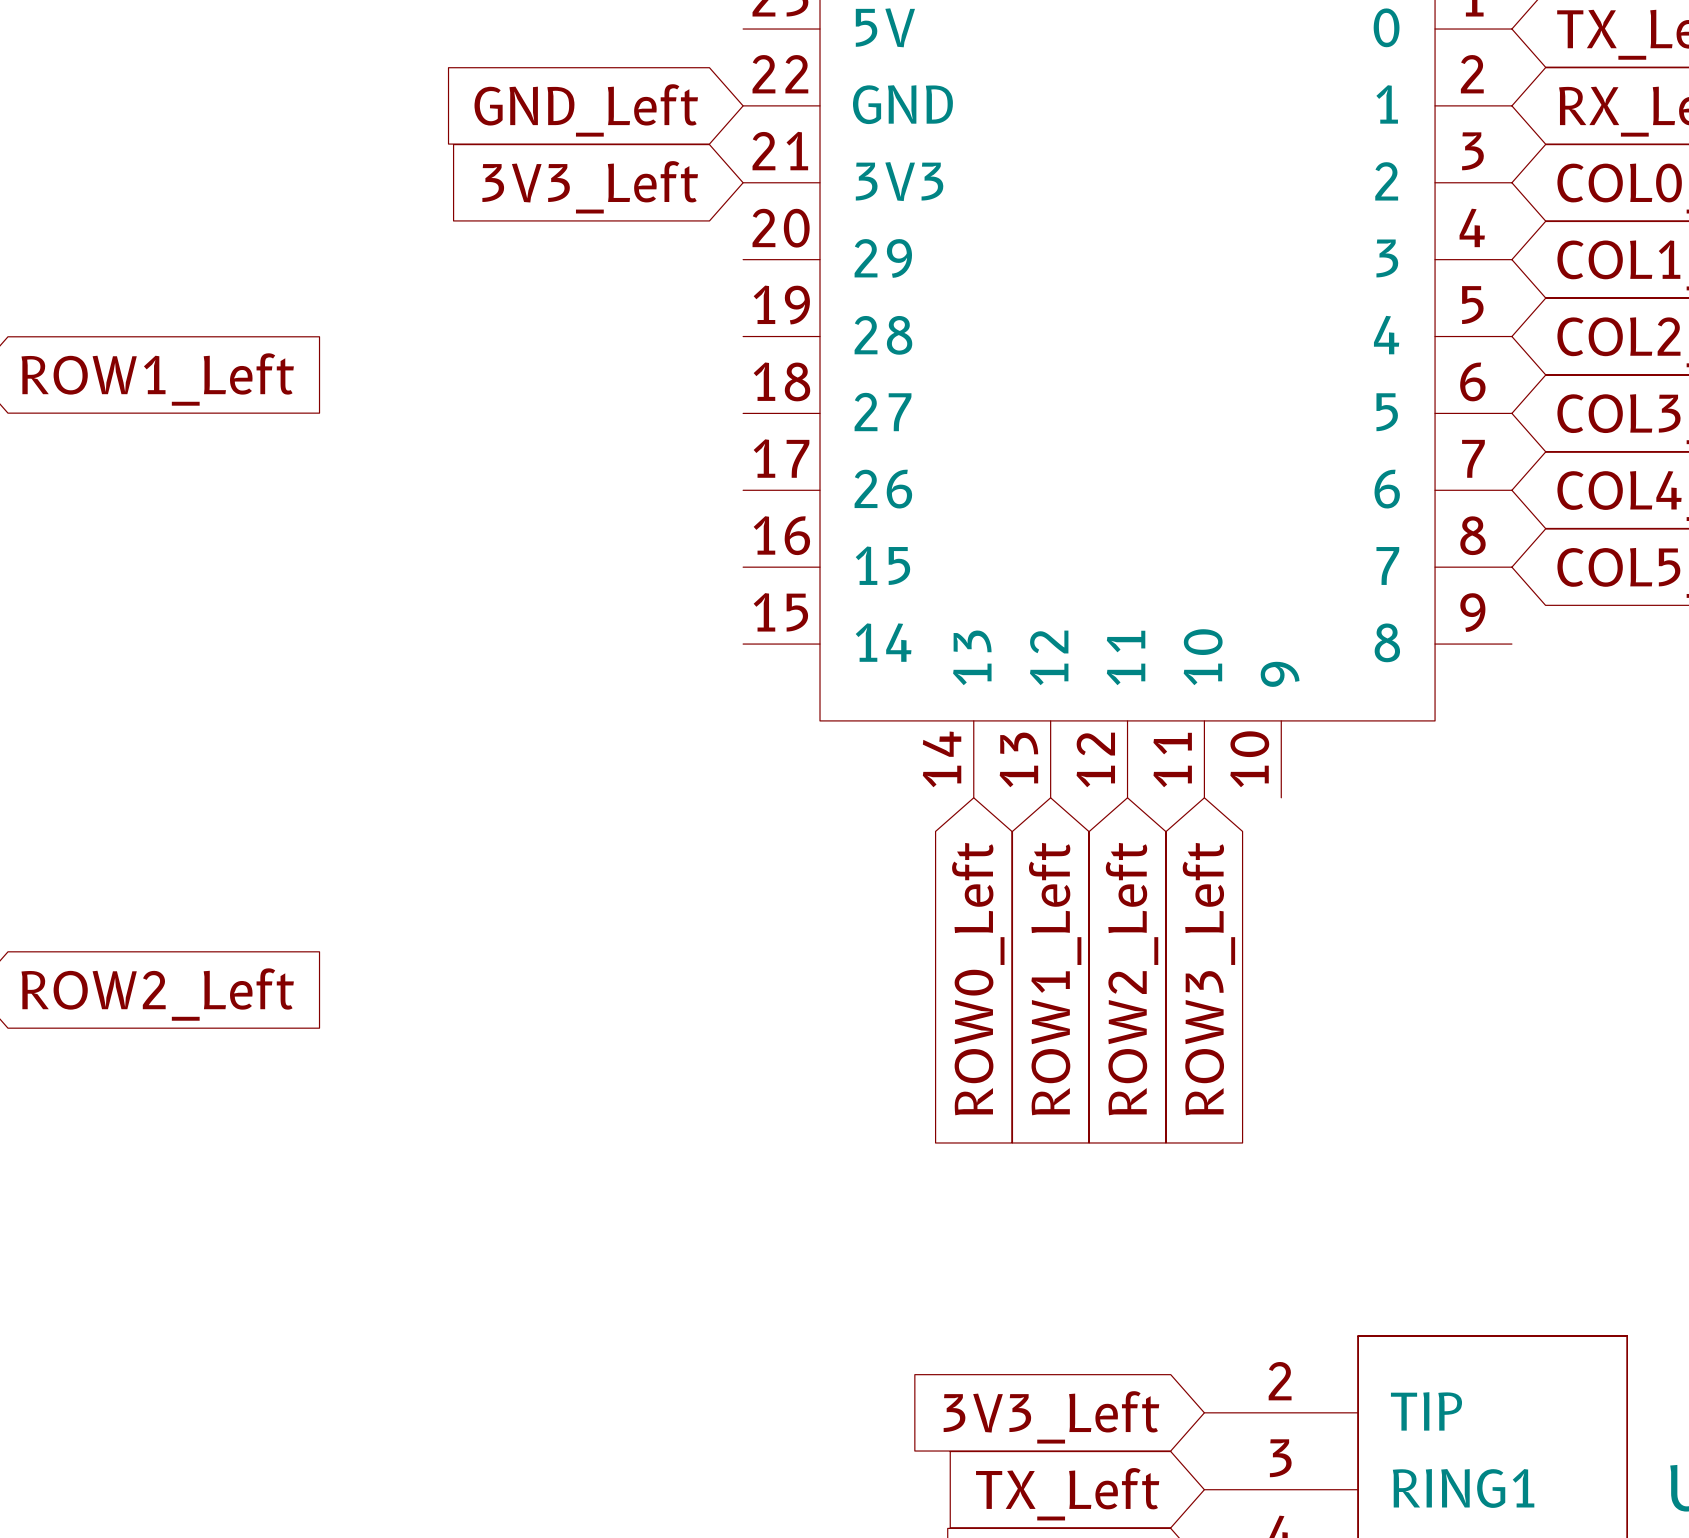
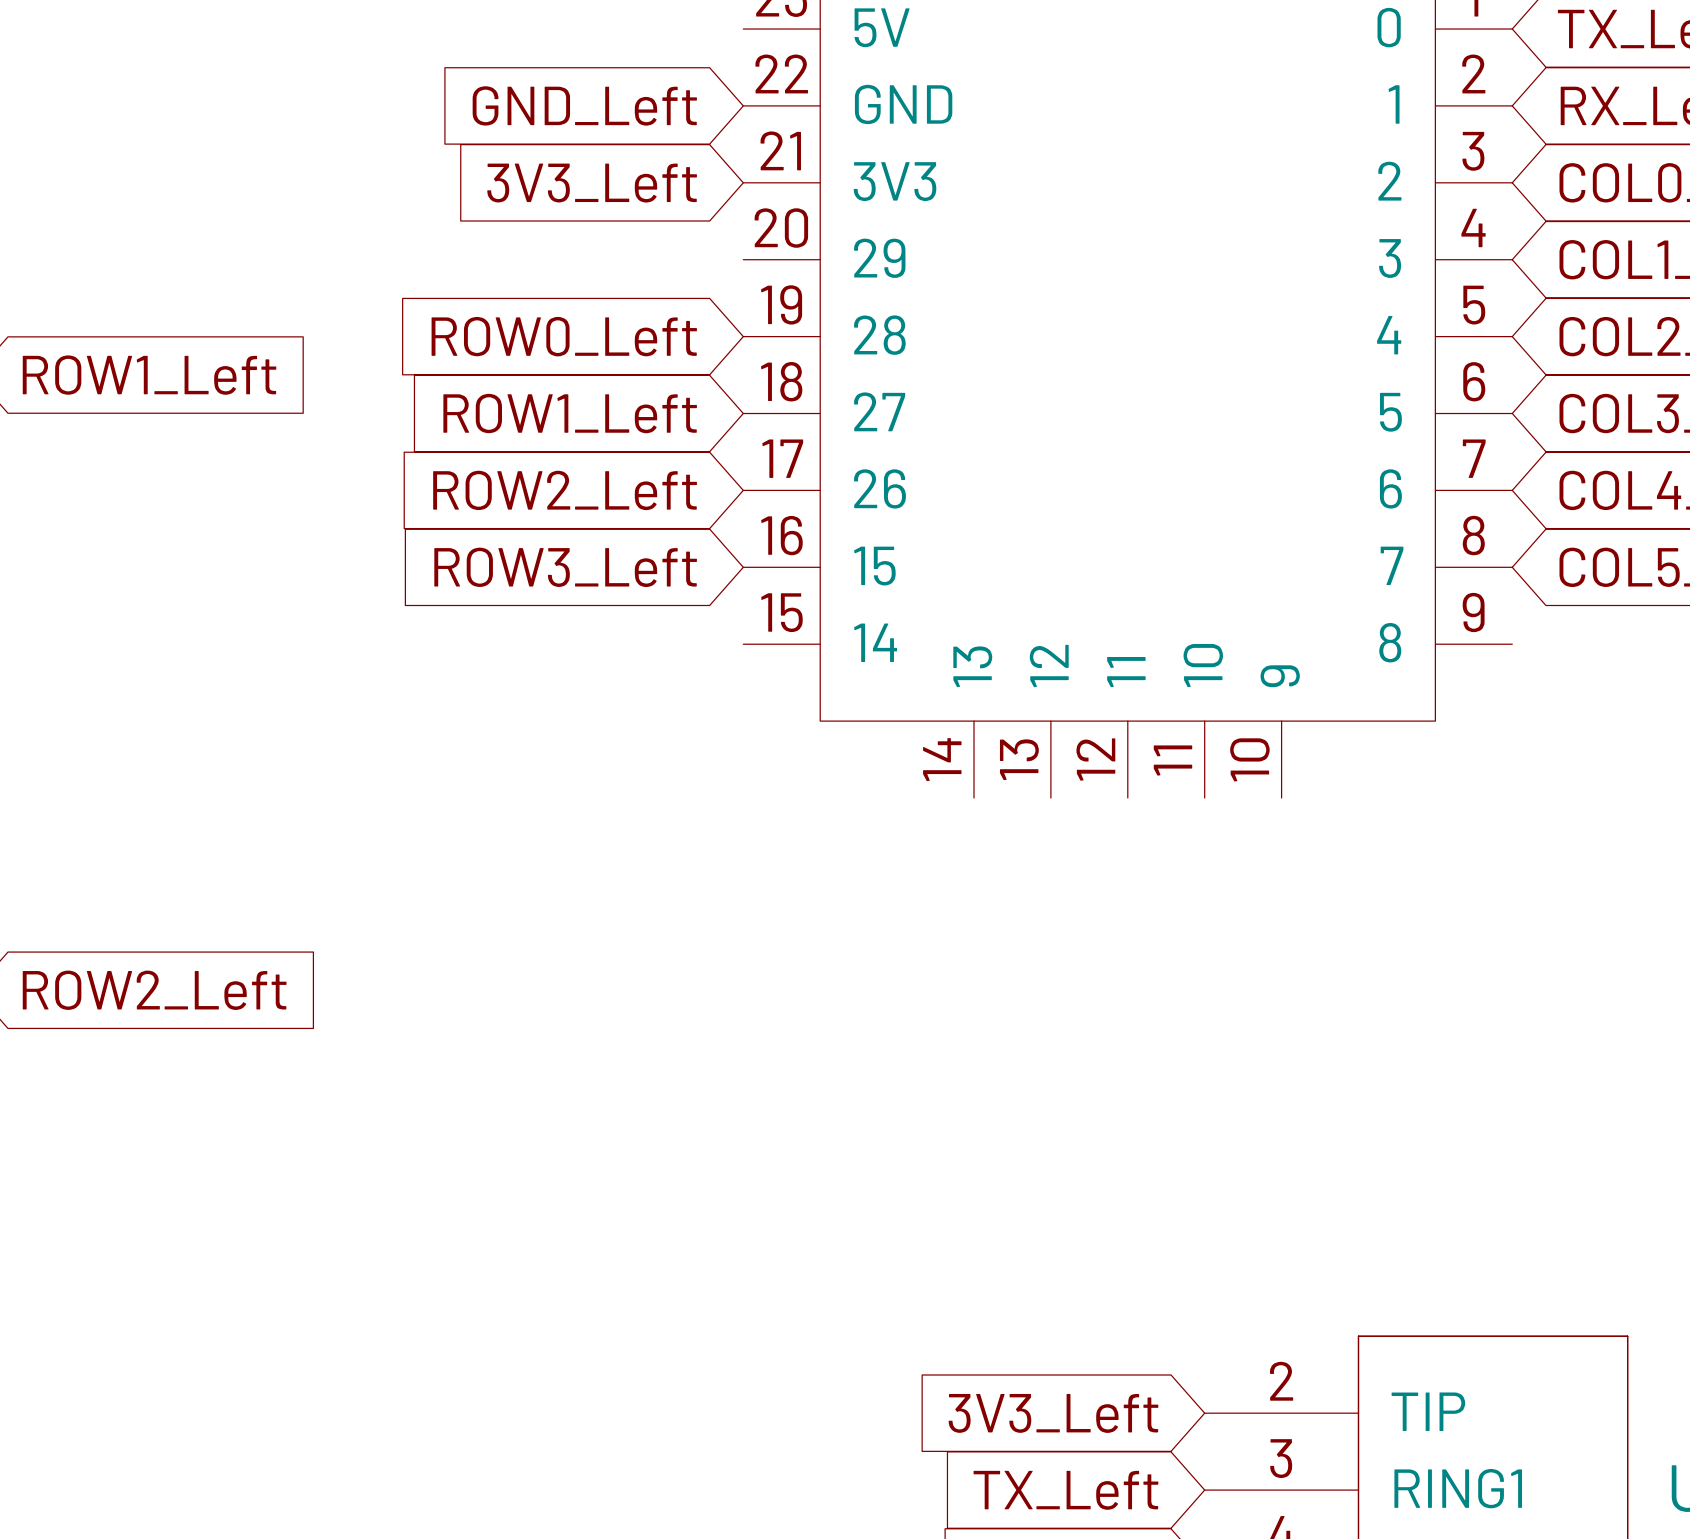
global label rotation: 0° (978, 979) -> 90° clockwise (564, 336)
global label position: ROW0_Left (978, 979) -> ROW0_Left (564, 336)
global label rotation: 0° (1055, 979) -> 90° clockwise (570, 413)
global label position: ROW1_Left (1055, 979) -> ROW1_Left (570, 413)
global label rotation: 0° (1132, 979) -> 90° clockwise (565, 490)
global label position: ROW2_Left (1132, 979) -> ROW2_Left (565, 490)
global label rotation: 0° (1208, 979) -> 90° clockwise (565, 567)
global label position: ROW3_Left (1208, 979) -> ROW3_Left (565, 567)

